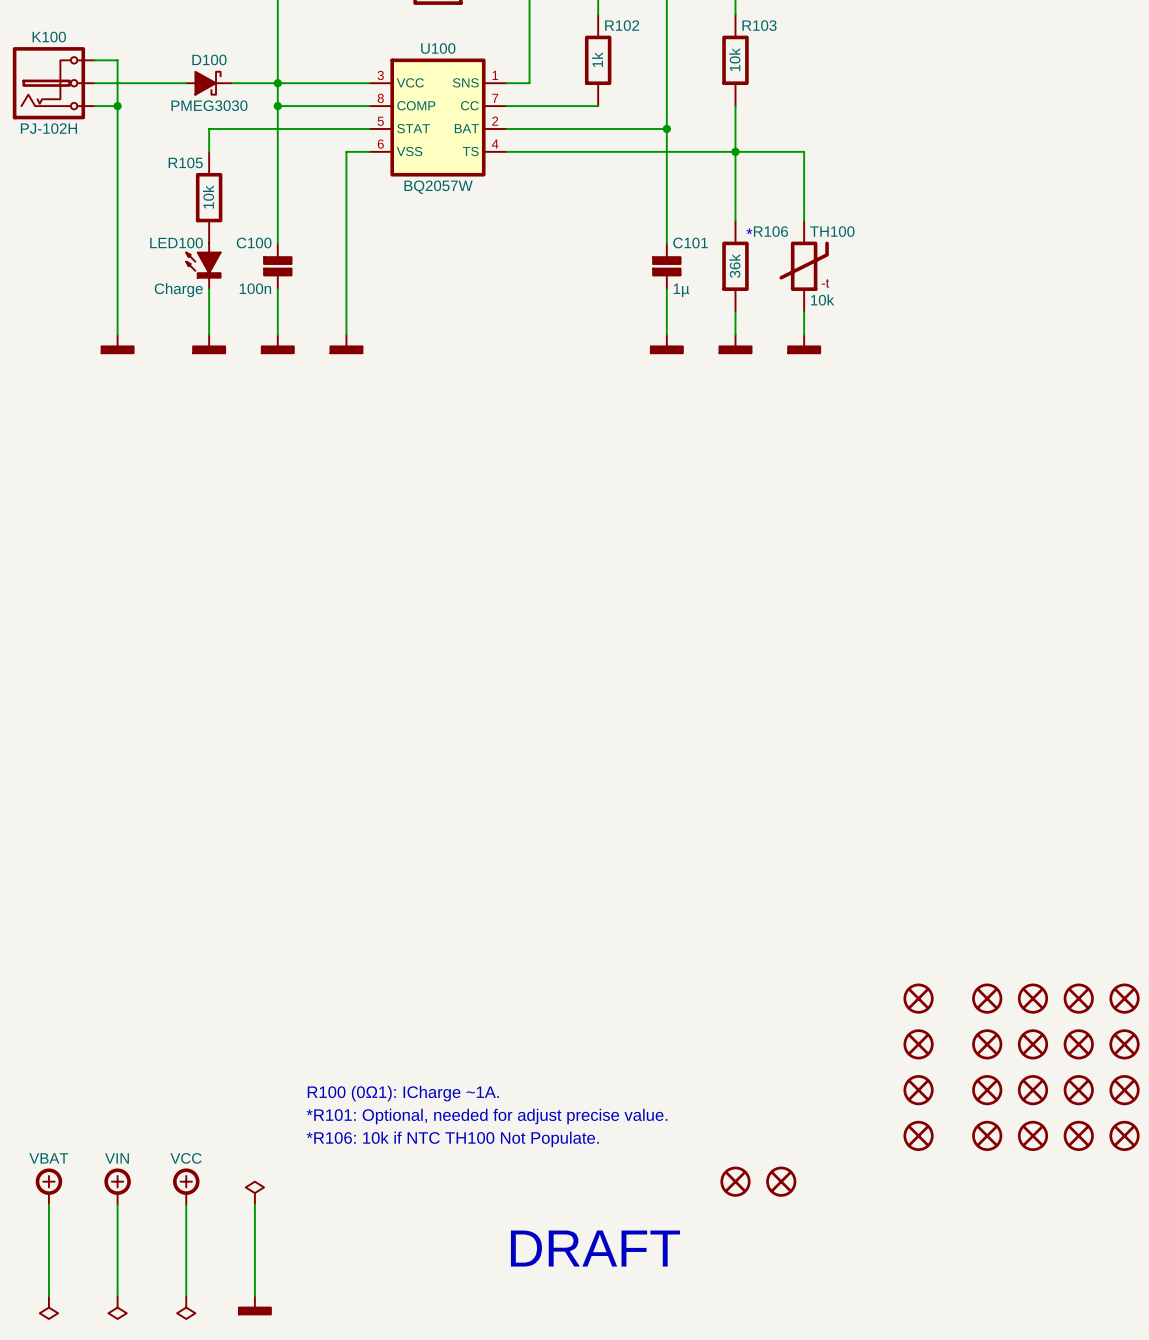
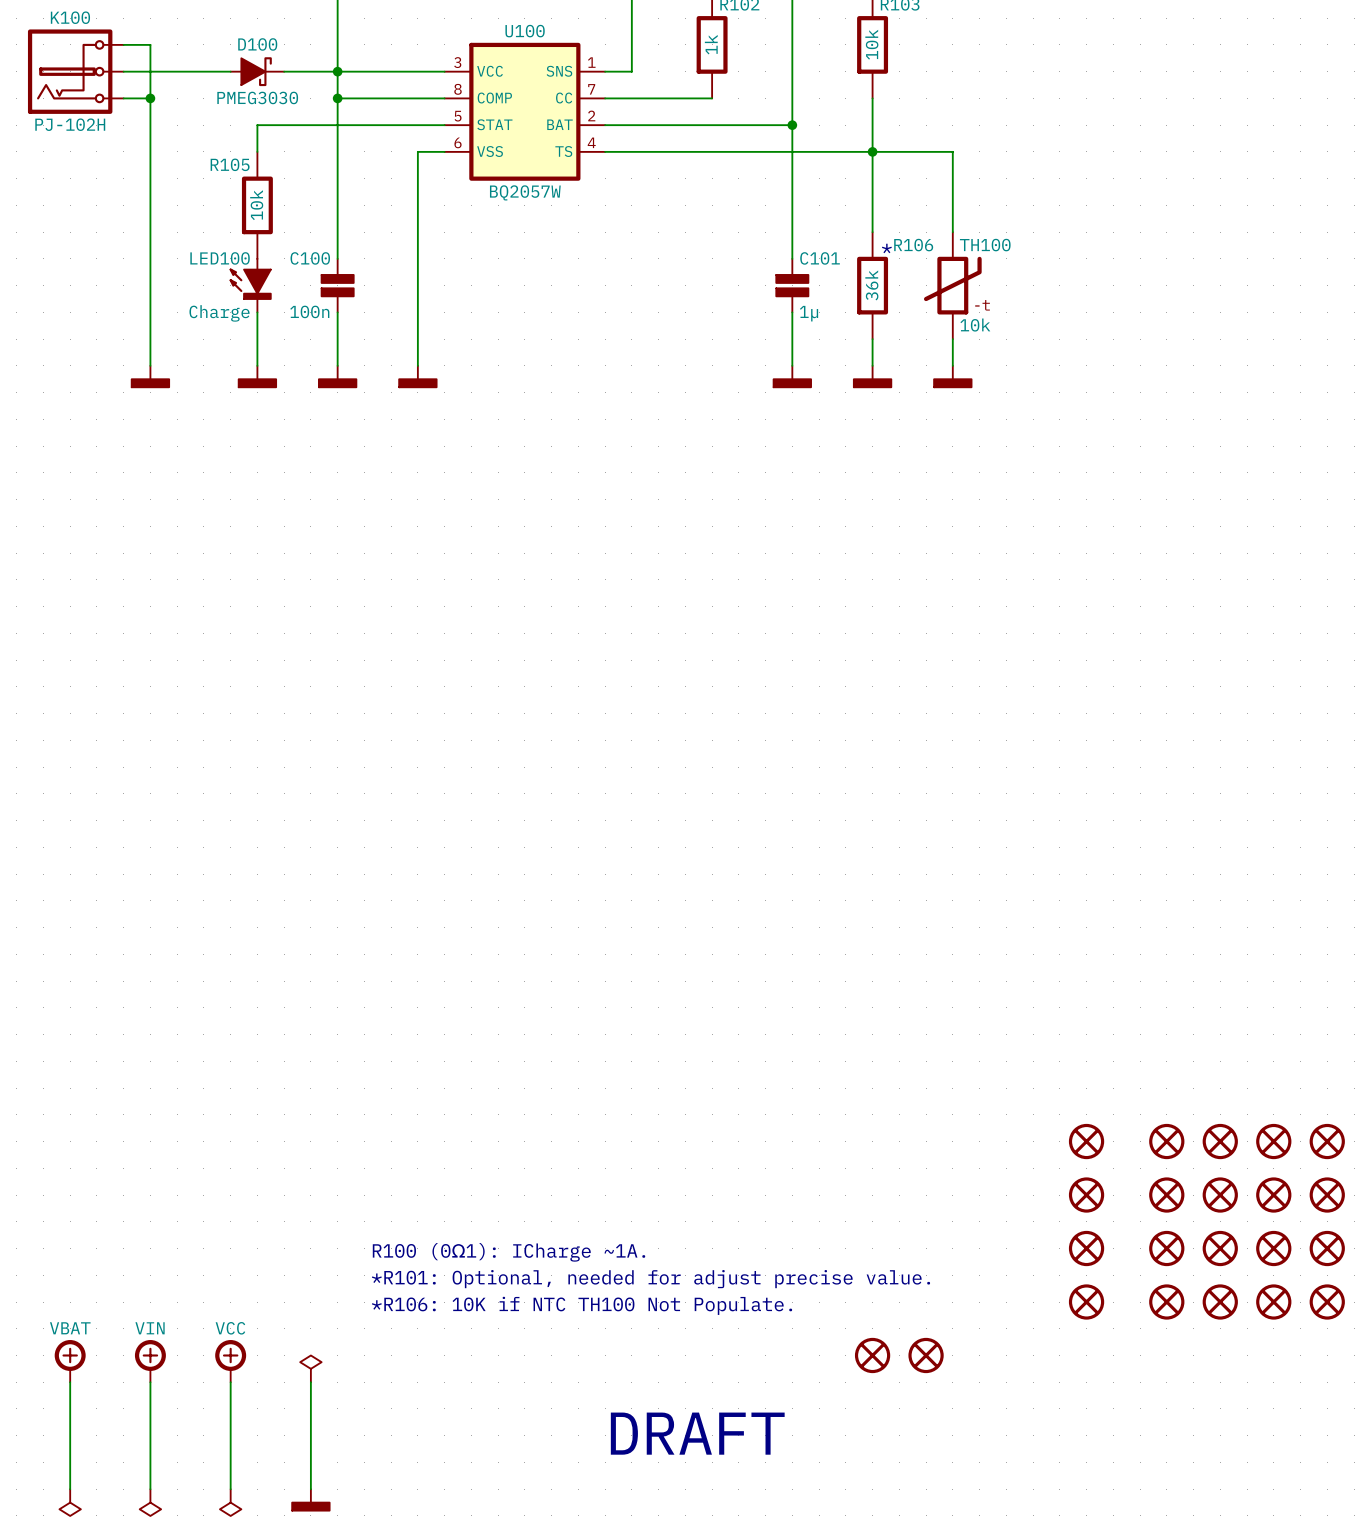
text: *R106: 10k if NTC TH100 Not Populate. (452, 1139) -> *R106: 10K if NTC TH100 Not Populate. (582, 1305)

